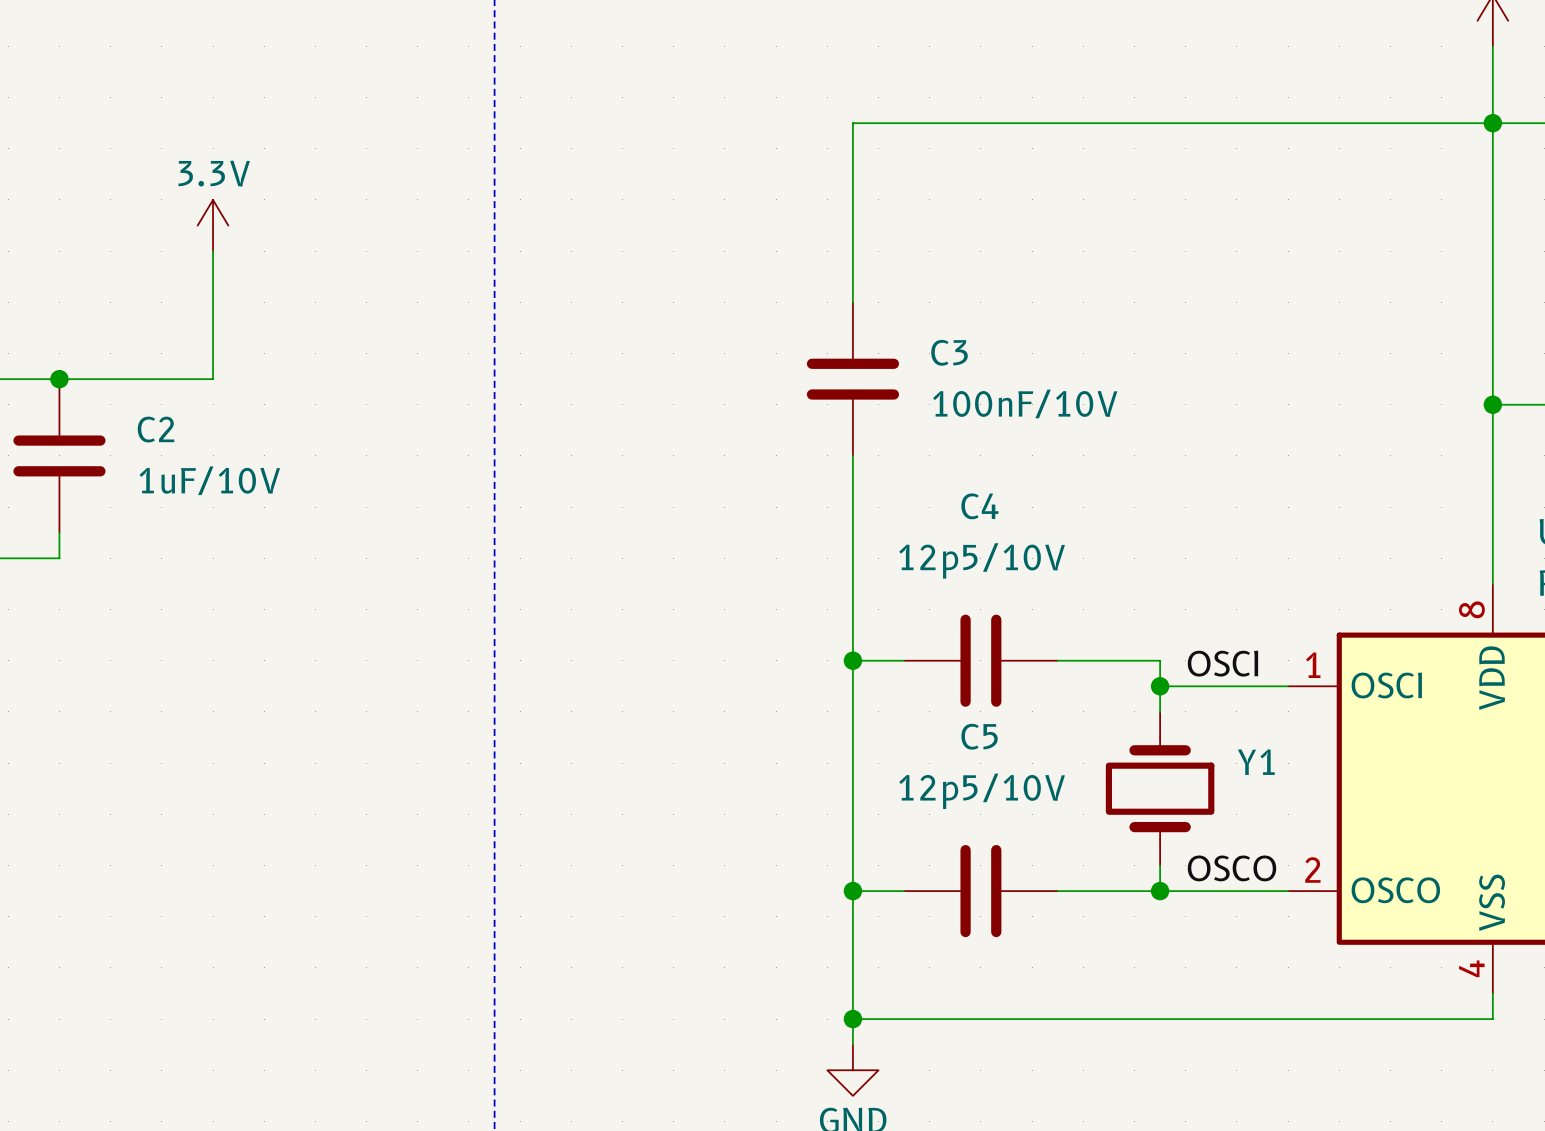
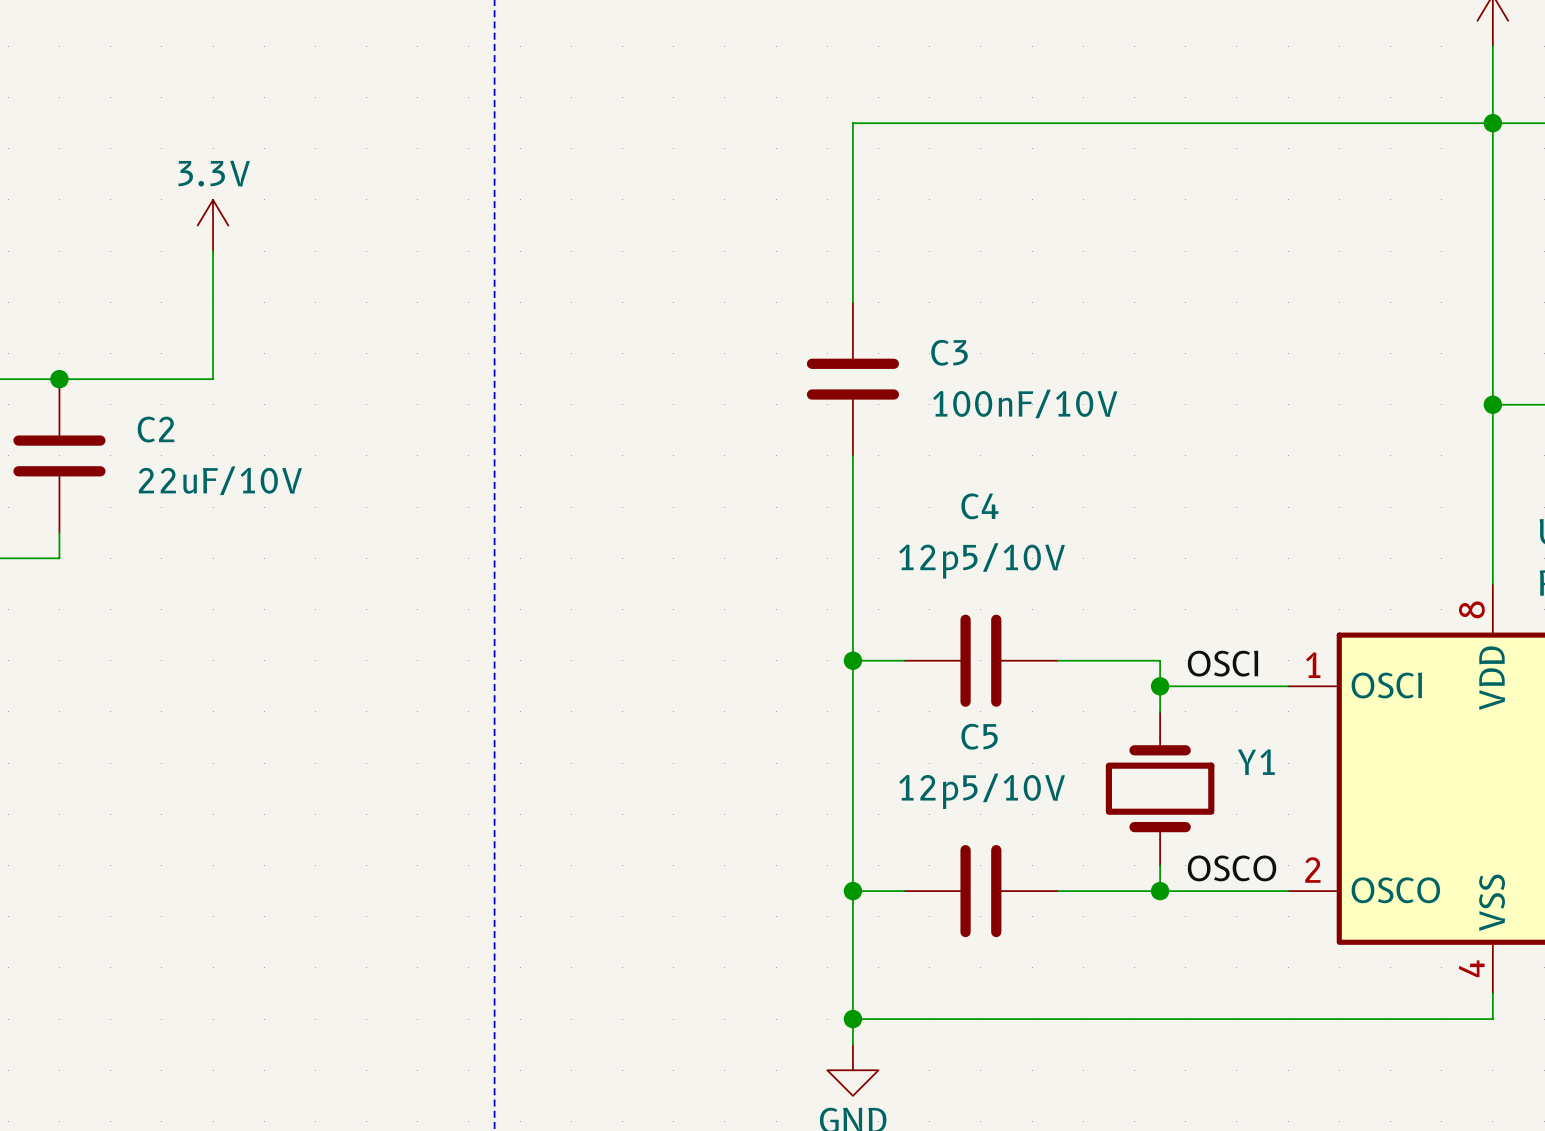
C2 value: 1uF/10V (209, 480) -> 22uF/10V (220, 480)

